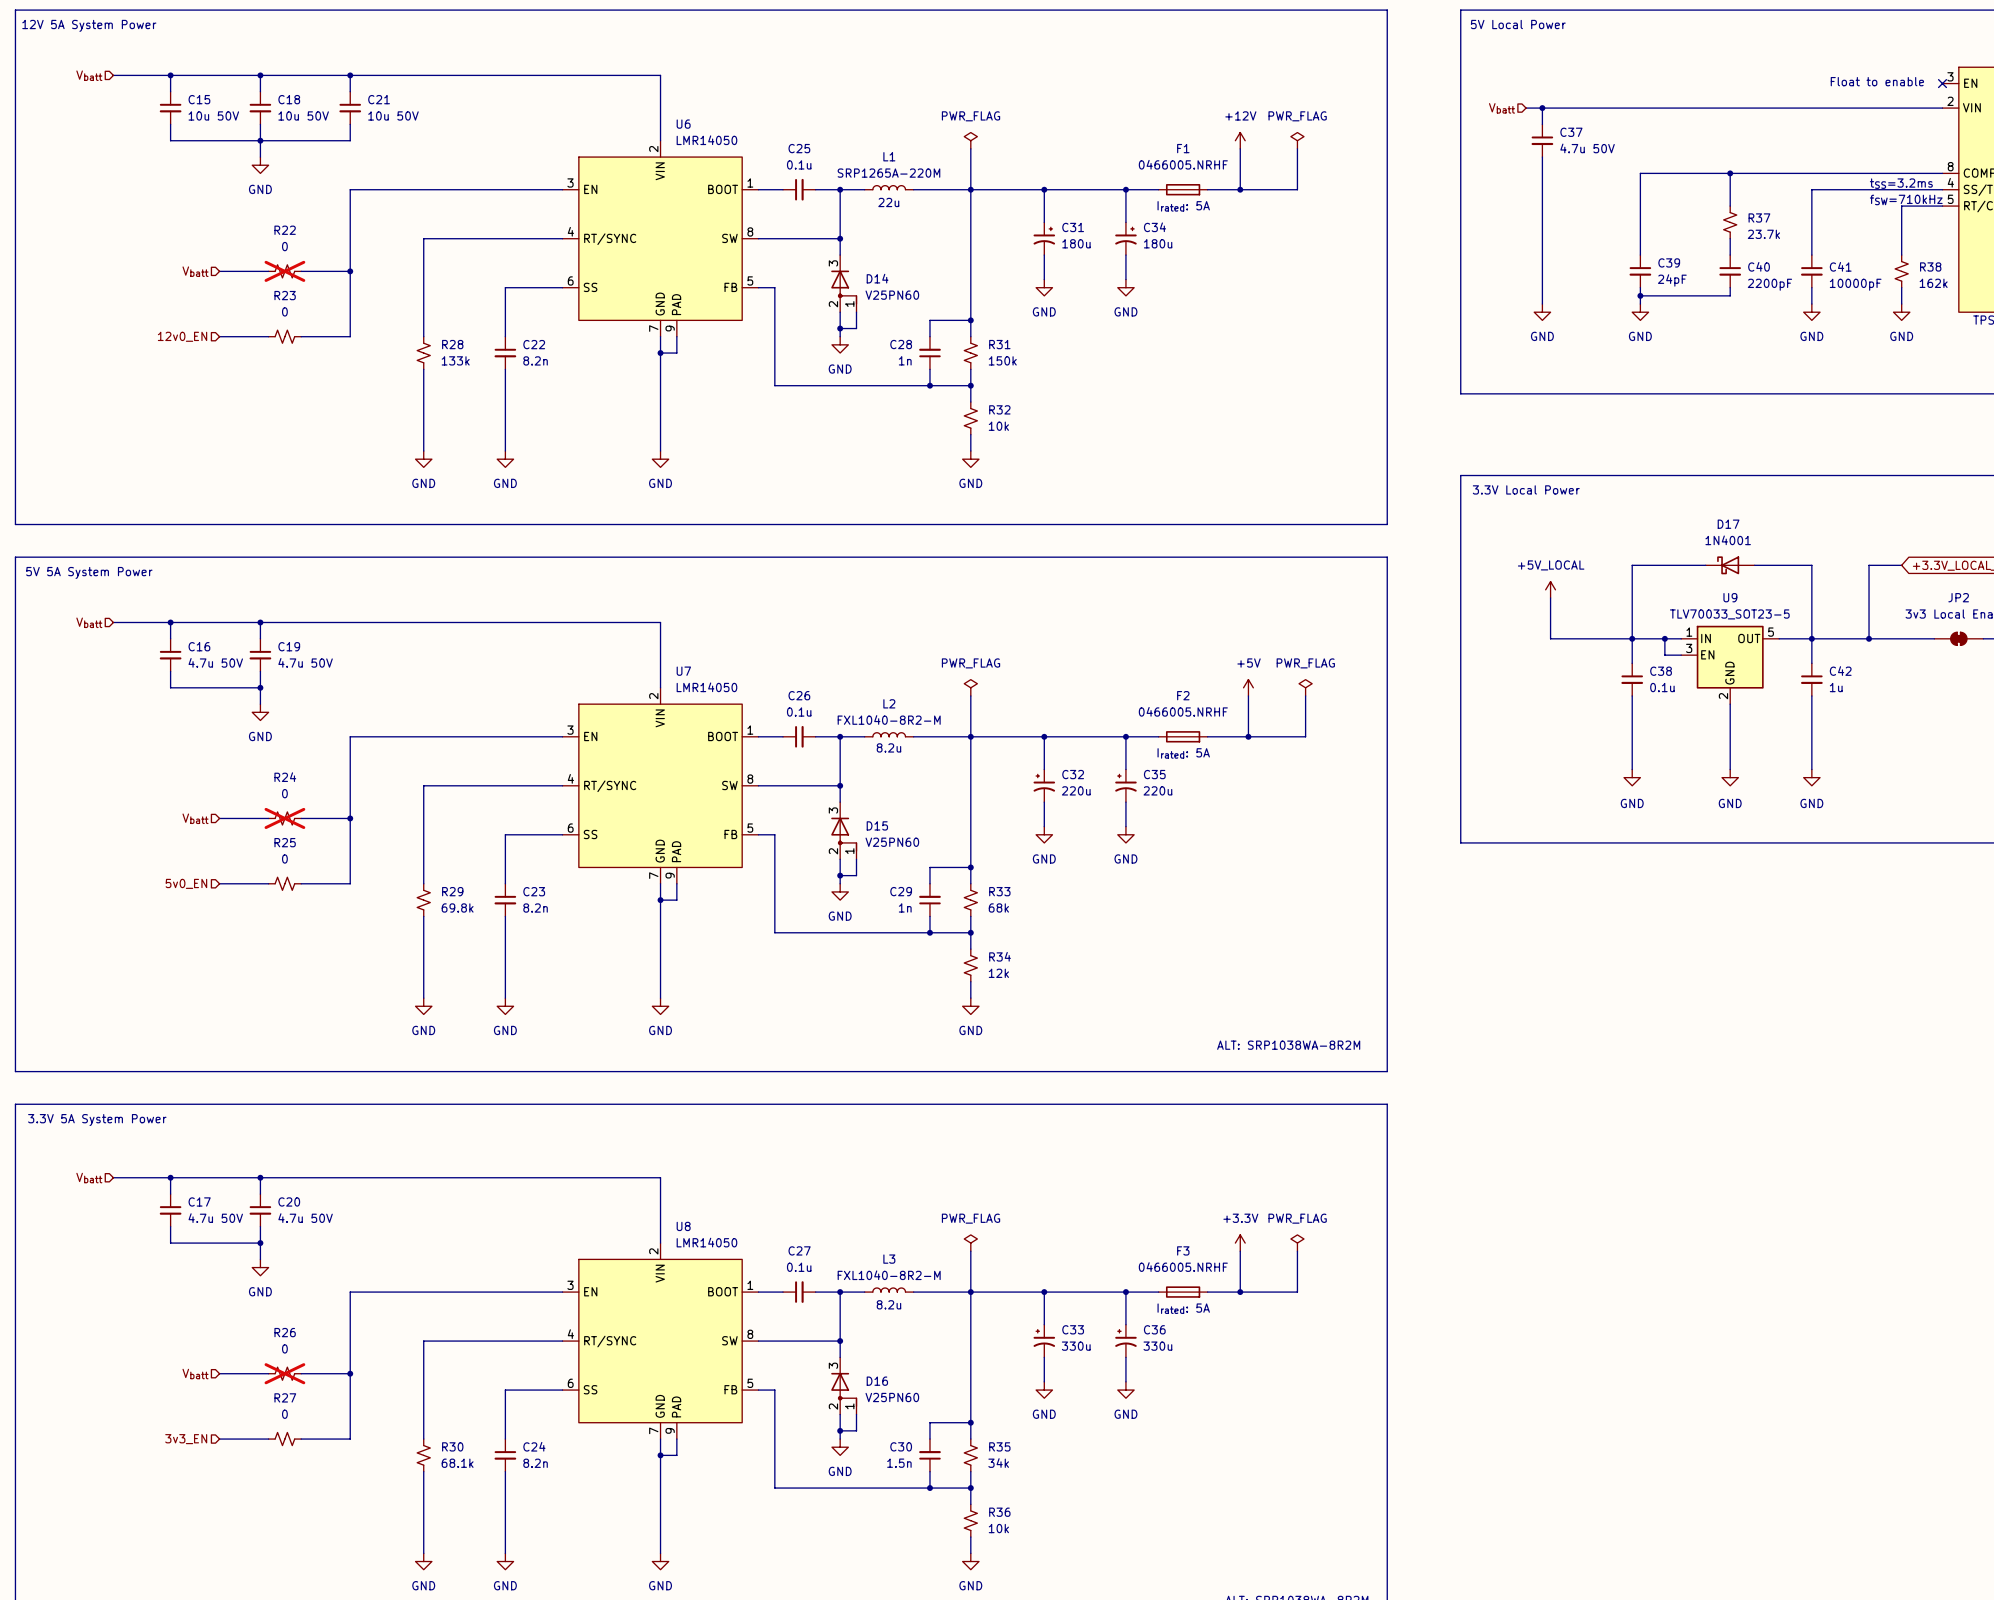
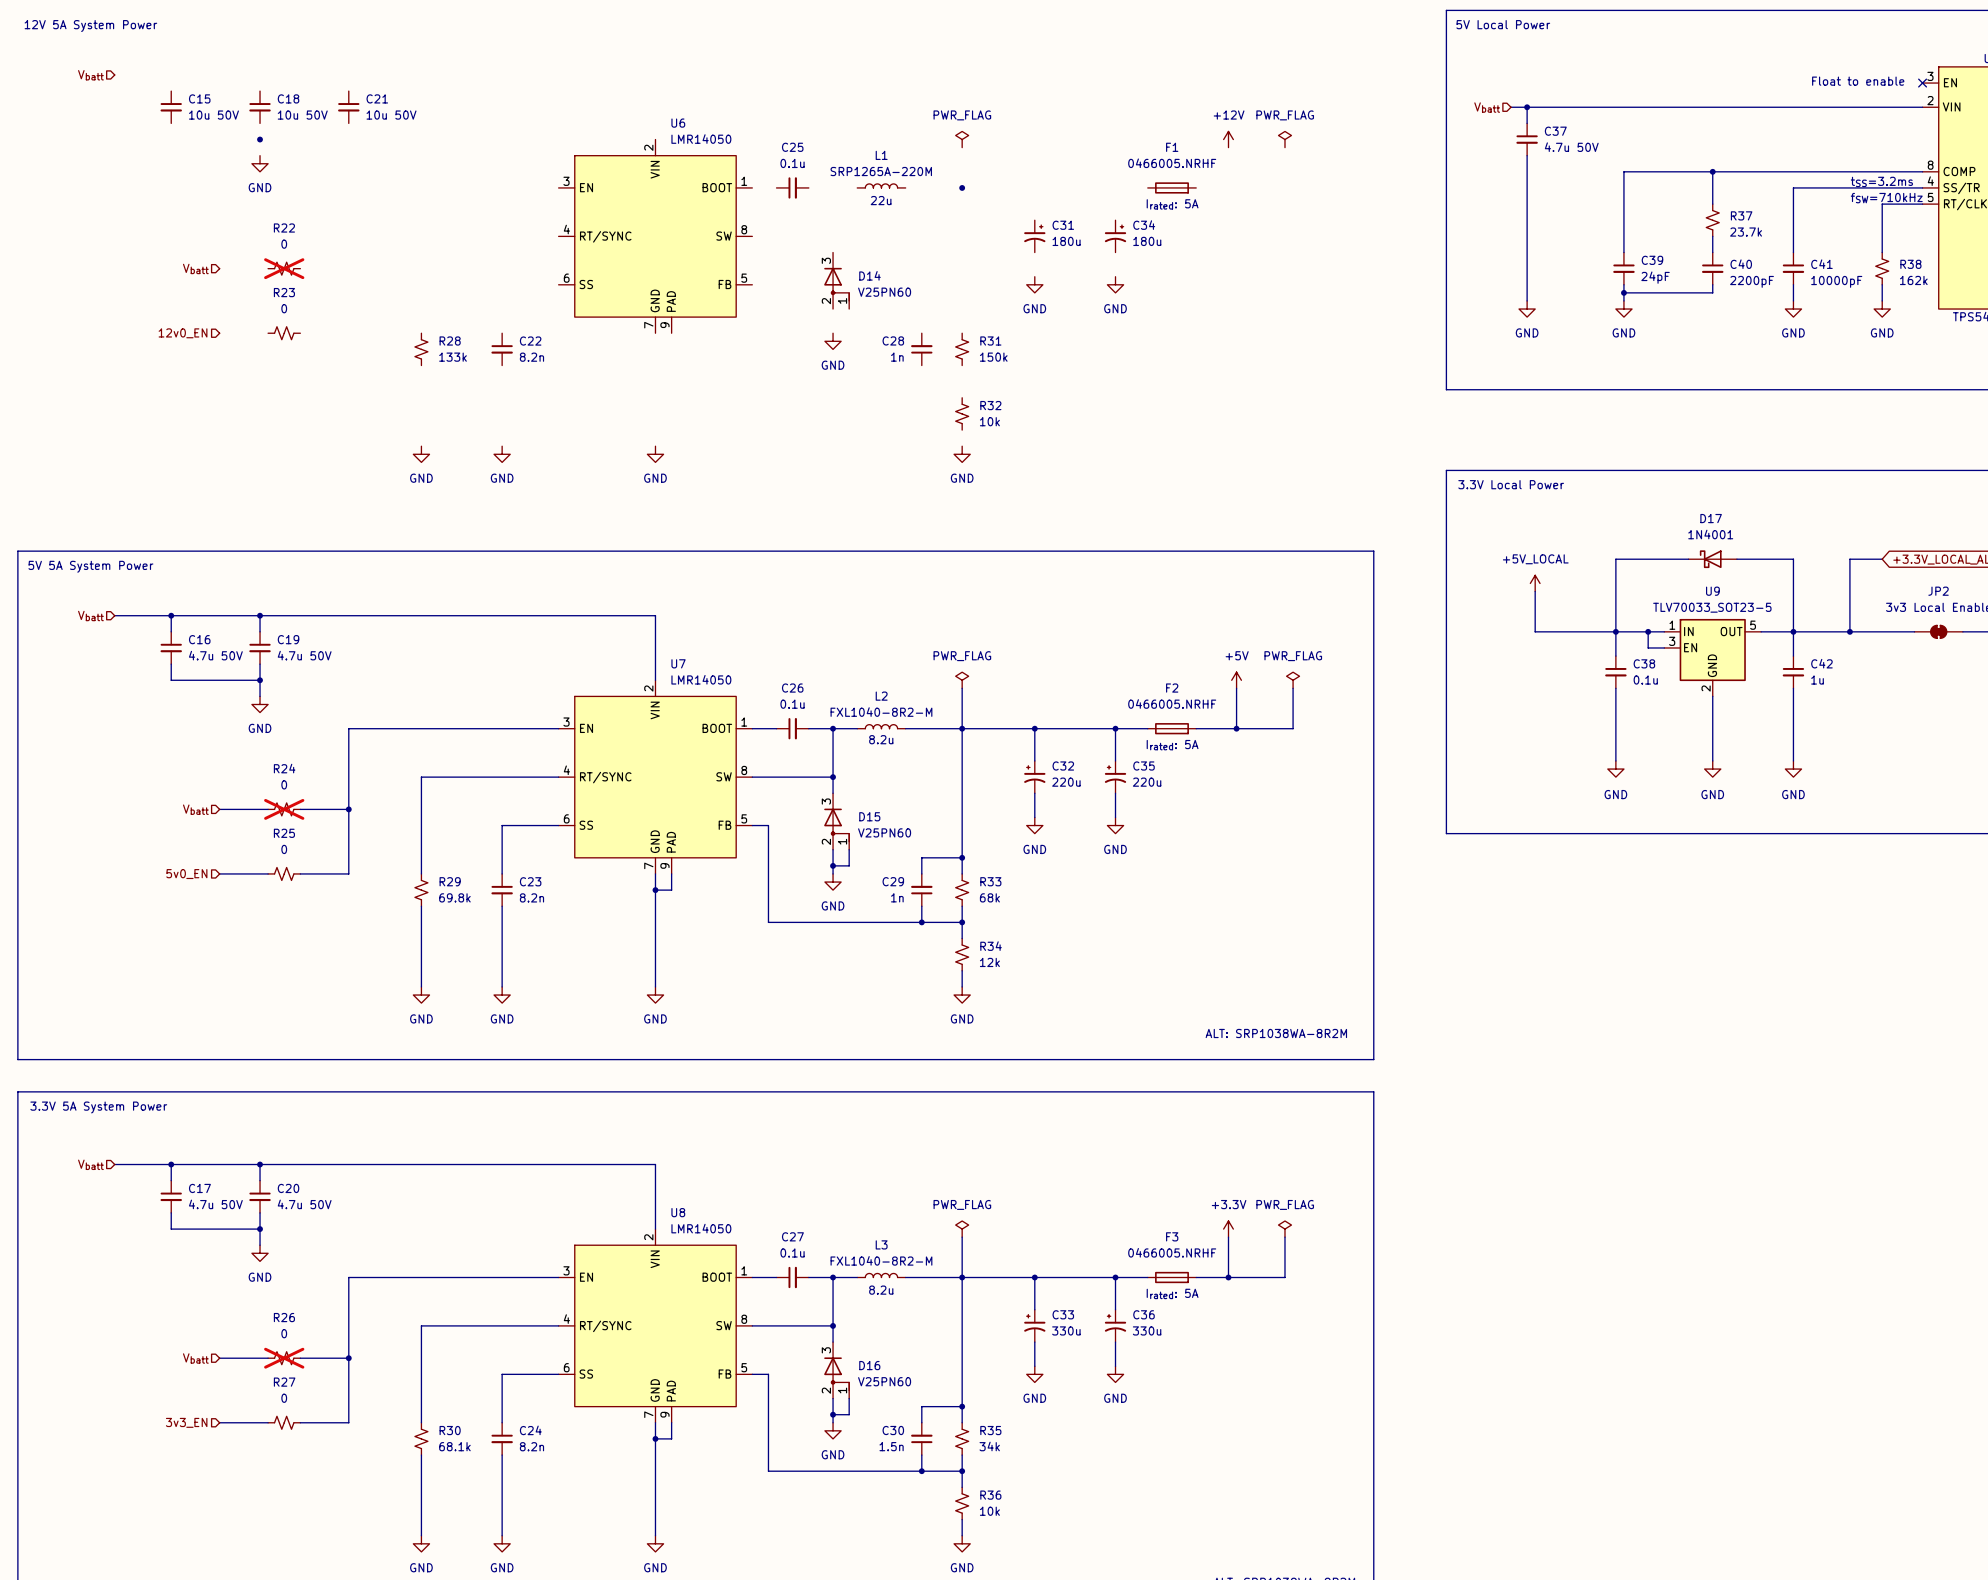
line: (15, 10) (1387, 10) (1387, 524) (15, 524) (15, 10) -> none
wire: (113, 75) (660, 75) (660, 140) -> none
wire: (170, 75) (170, 91) -> none
junction: (170, 75) -> none
wire: (260, 75) (260, 91) -> none
junction: (260, 75) -> none
wire: (350, 75) (350, 91) -> none
junction: (350, 75) -> none
wire: (170, 124) (170, 140) (350, 140) (350, 124) -> none
wire: (260, 124) (260, 157) -> none
wire: (970, 148) (970, 336) -> none
wire: (1240, 148) (1240, 189) -> none
wire: (1297, 148) (1297, 189) (1207, 189) -> none
wire: (562, 189) (350, 189) (350, 336) (301, 336) -> none
wire: (758, 189) (783, 189) -> none
wire: (815, 189) (864, 189) -> none
wire: (840, 189) (840, 255) -> none
junction: (840, 189) -> none
wire: (913, 189) (1158, 189) -> none
wire: (1044, 189) (1044, 222) -> none
junction: (1044, 189) -> none
wire: (1125, 189) (1125, 222) -> none
junction: (1125, 189) -> none
junction: (1240, 189) -> none
wire: (562, 238) (423, 238) (423, 336) -> none
wire: (758, 238) (840, 238) -> none
junction: (840, 238) -> none
wire: (1044, 255) (1044, 279) -> none
wire: (1125, 255) (1125, 279) -> none
wire: (219, 271) (268, 271) -> none
wire: (301, 271) (350, 271) -> none
junction: (350, 271) -> none
wire: (562, 287) (505, 287) (505, 336) -> none
wire: (758, 287) (774, 287) (774, 385) (970, 385) -> none
wire: (840, 312) (840, 336) -> none
wire: (856, 312) (856, 328) (840, 328) -> none
wire: (970, 320) (929, 320) (929, 336) -> none
junction: (970, 320) -> none
junction: (840, 328) -> none
wire: (219, 336) (268, 336) -> none
wire: (660, 336) (660, 451) -> none
wire: (676, 336) (676, 353) (660, 353) -> none
junction: (660, 353) -> none
wire: (423, 369) (423, 451) -> none
wire: (505, 369) (505, 451) -> none
wire: (929, 369) (929, 385) -> none
wire: (970, 369) (970, 402) -> none
junction: (929, 385) -> none
junction: (970, 385) -> none
wire: (970, 434) (970, 451) -> none

